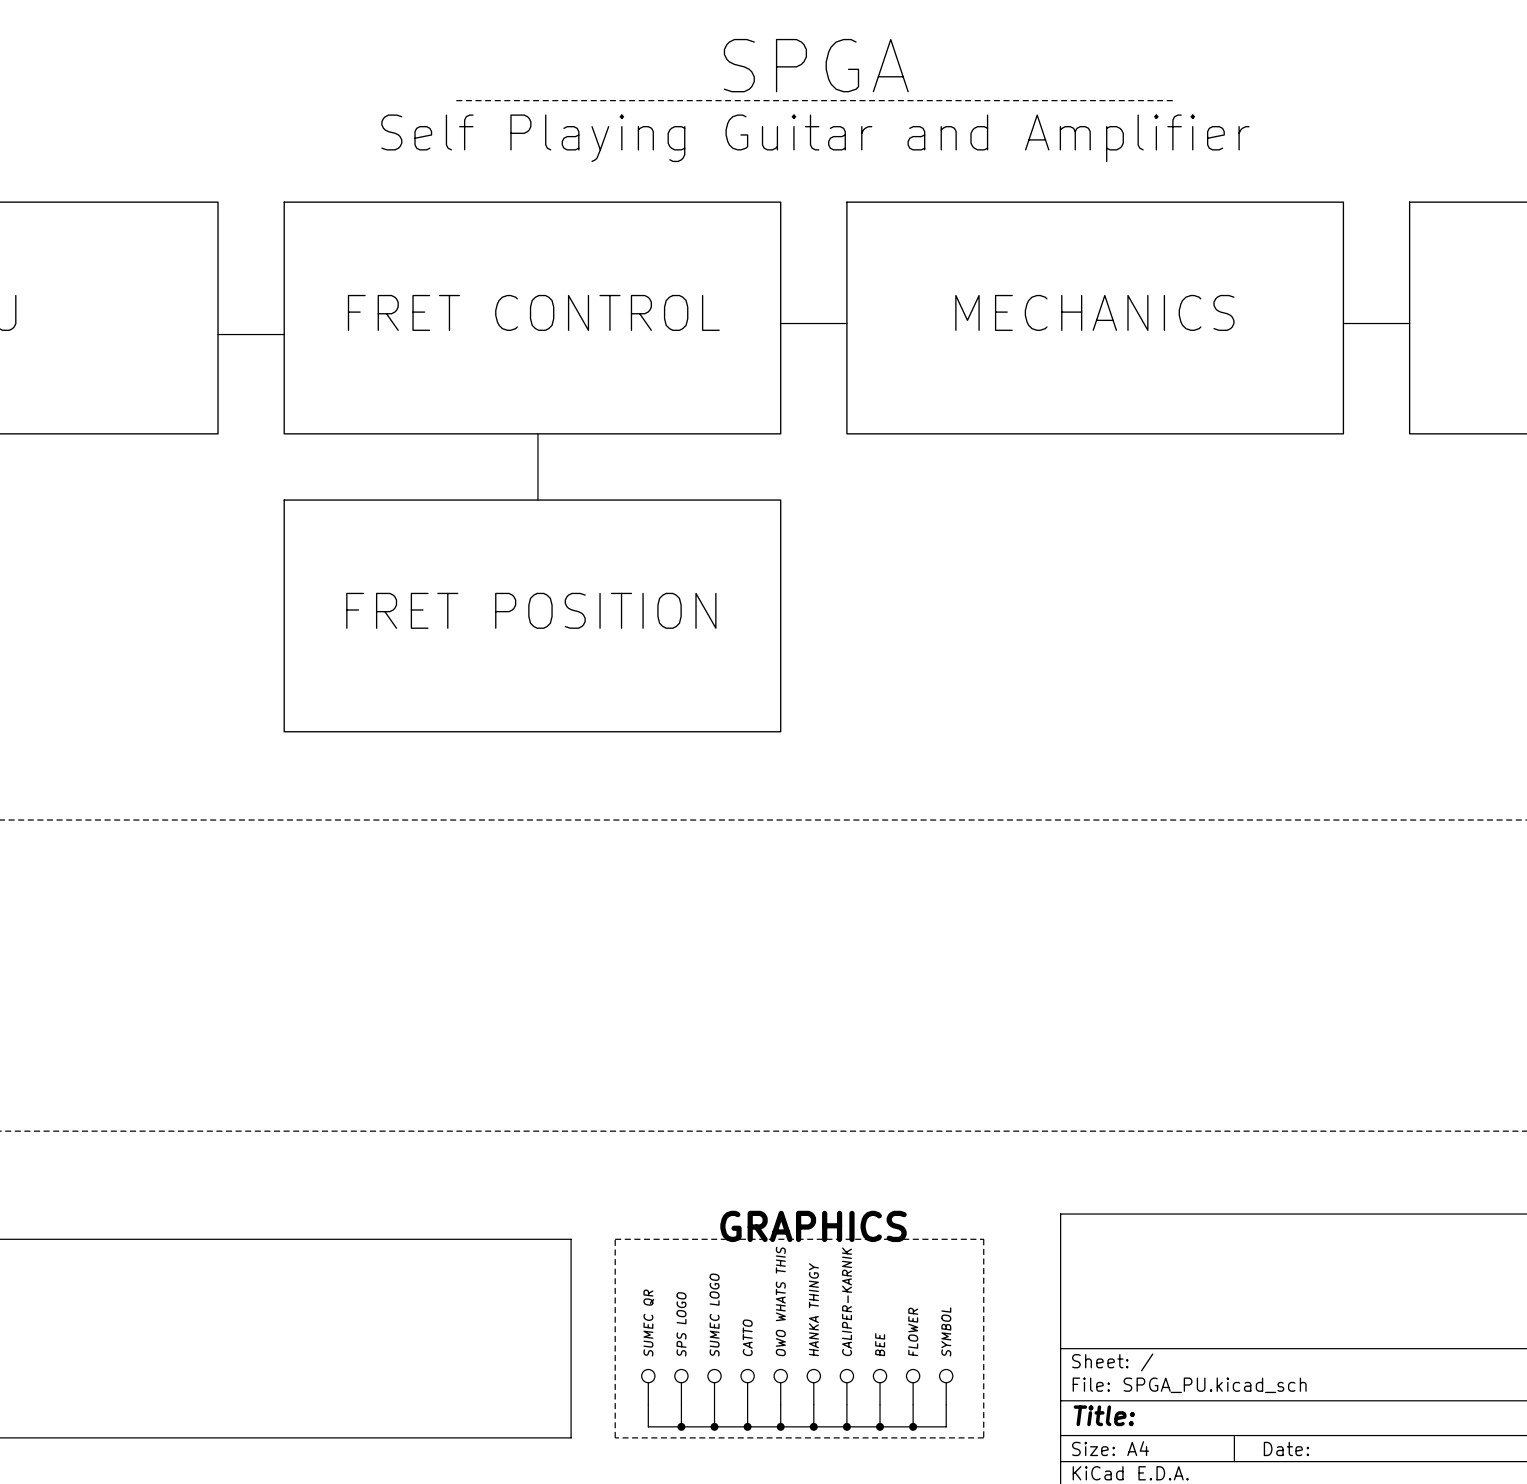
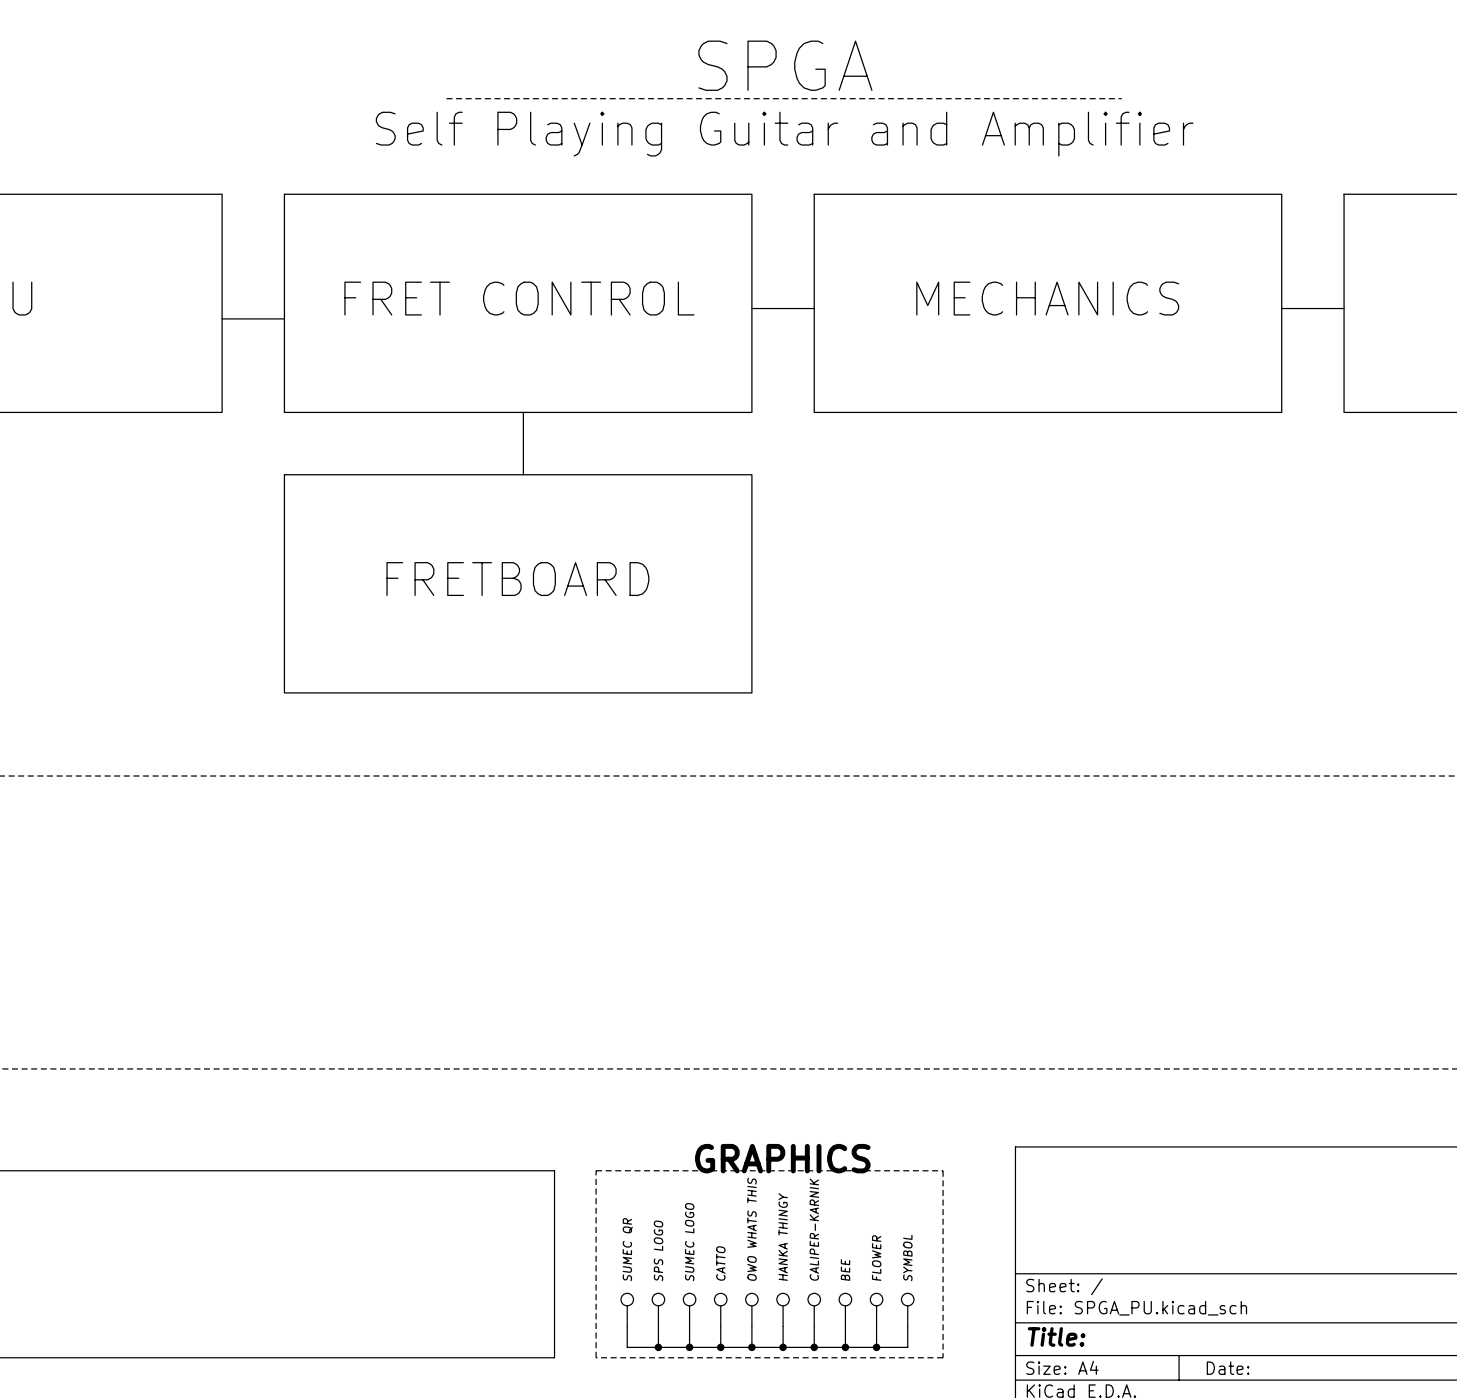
sheet FRET POSITION name: FRET POSITION (531, 610) -> FRETBOARD (517, 579)

